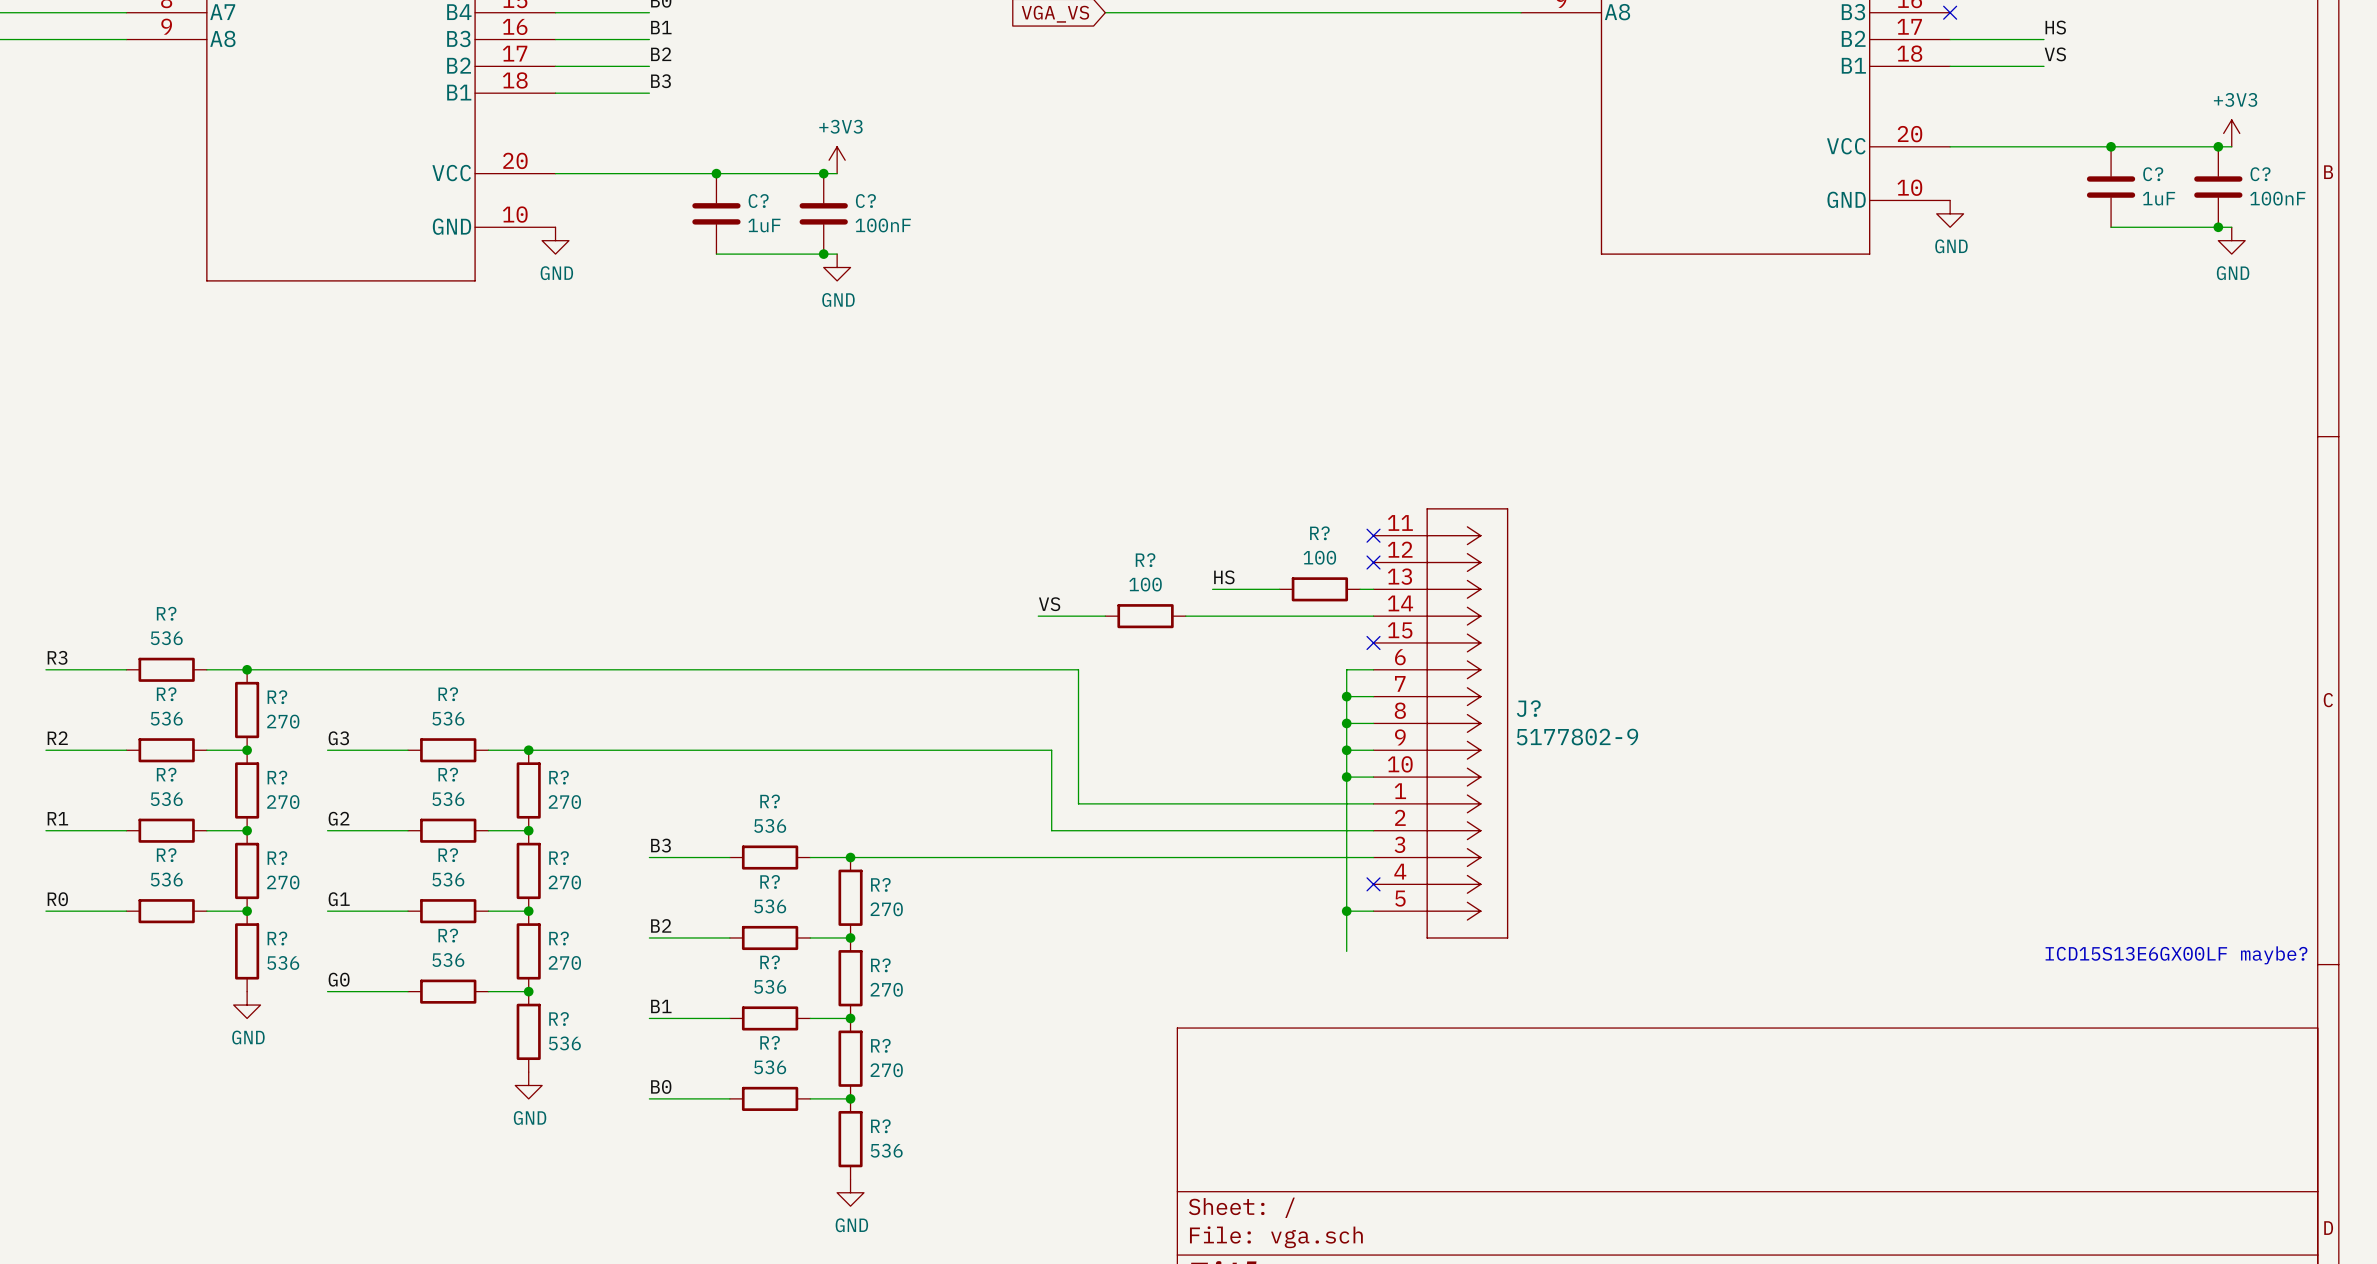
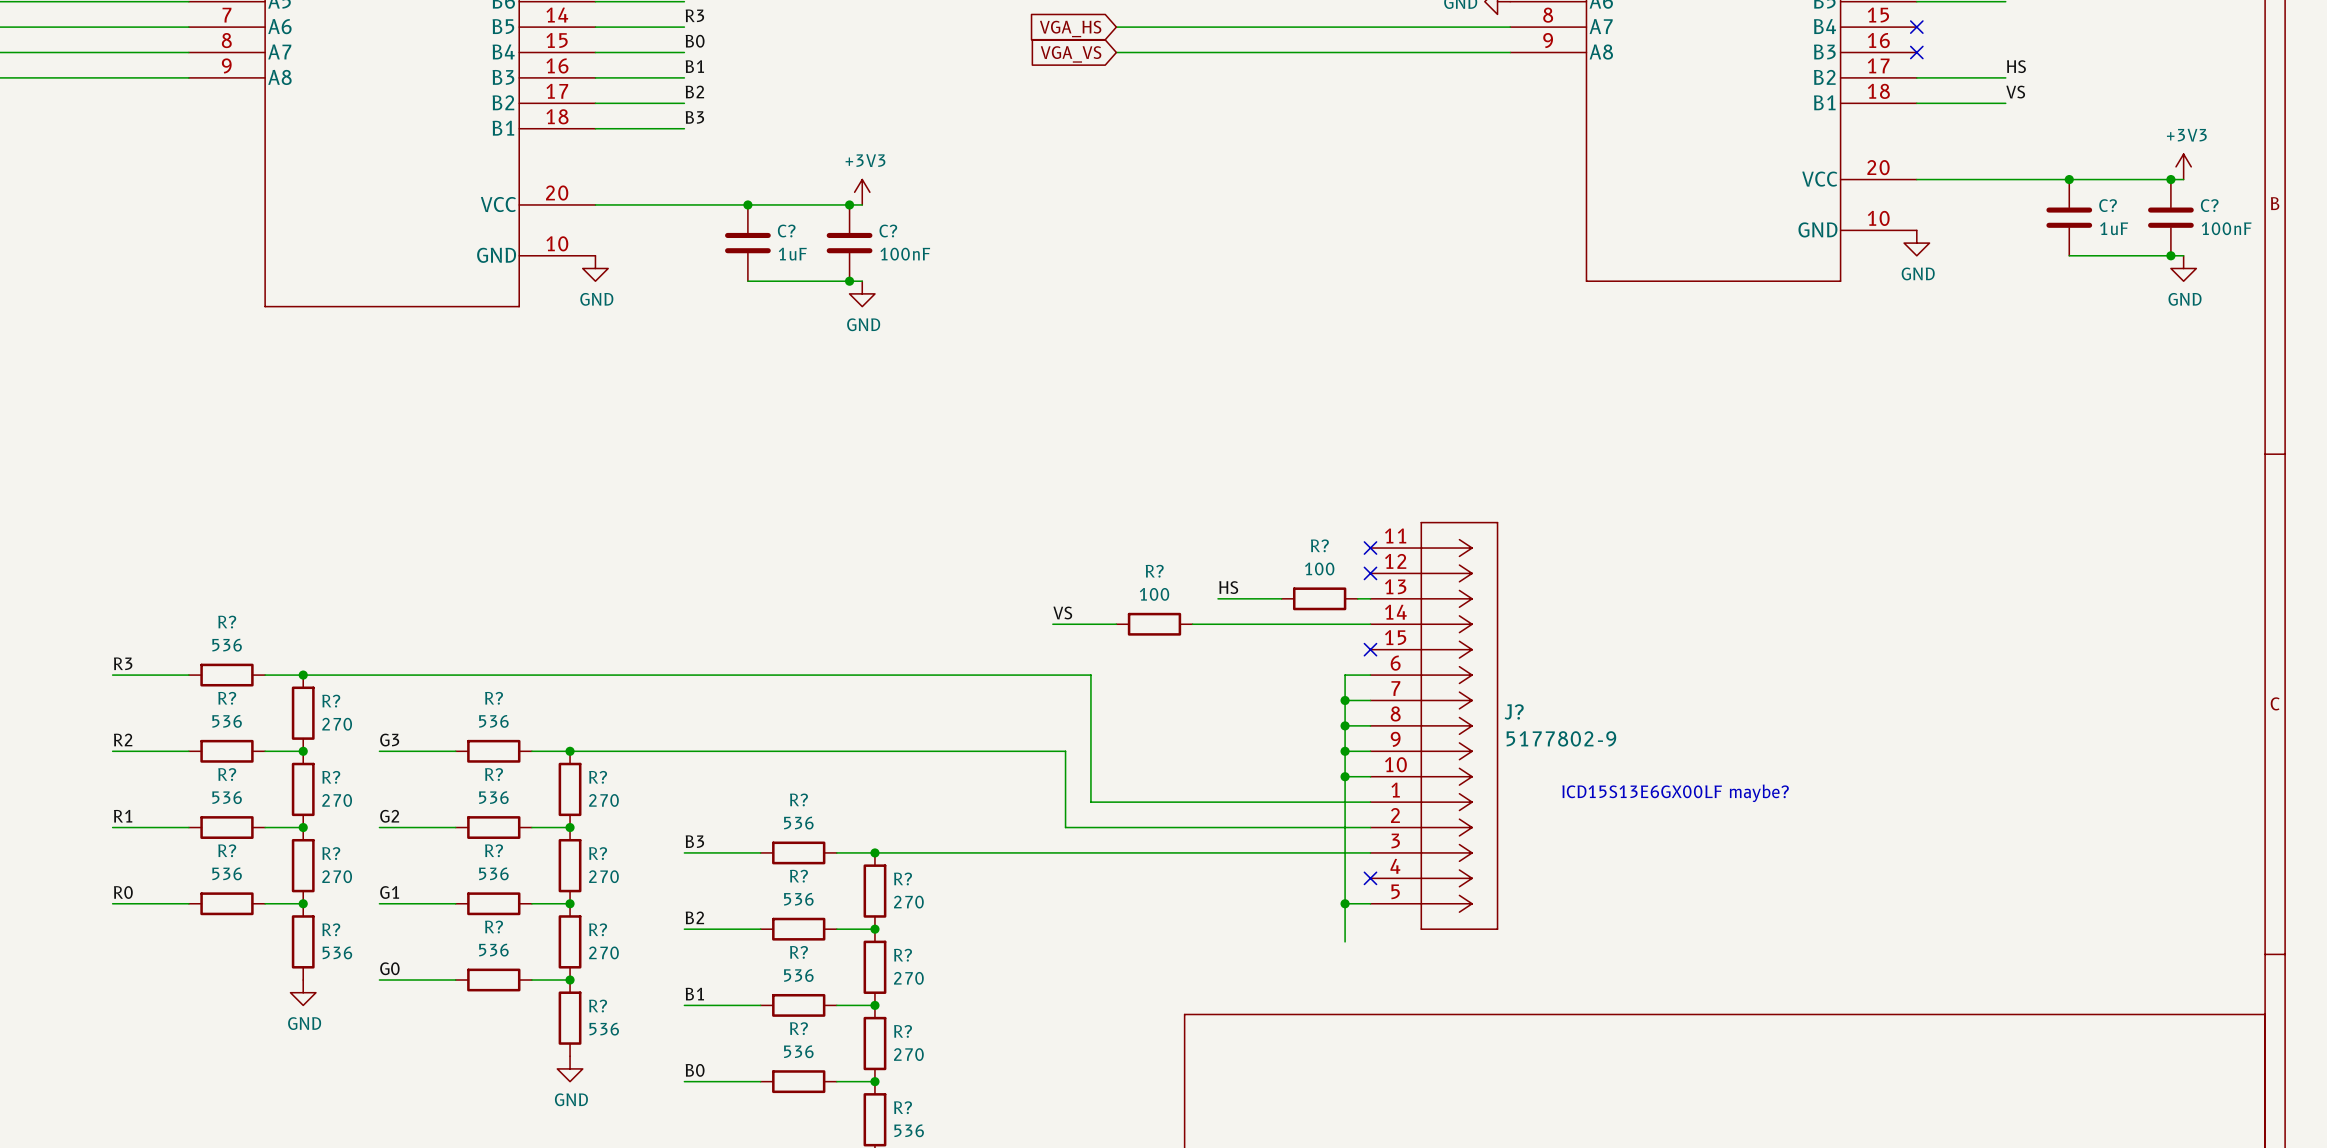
text: none -> ICD15S13E6GX00LF maybe? (1675, 793)
text: ICD15S13E6GX00LF maybe? (2176, 955) -> none

